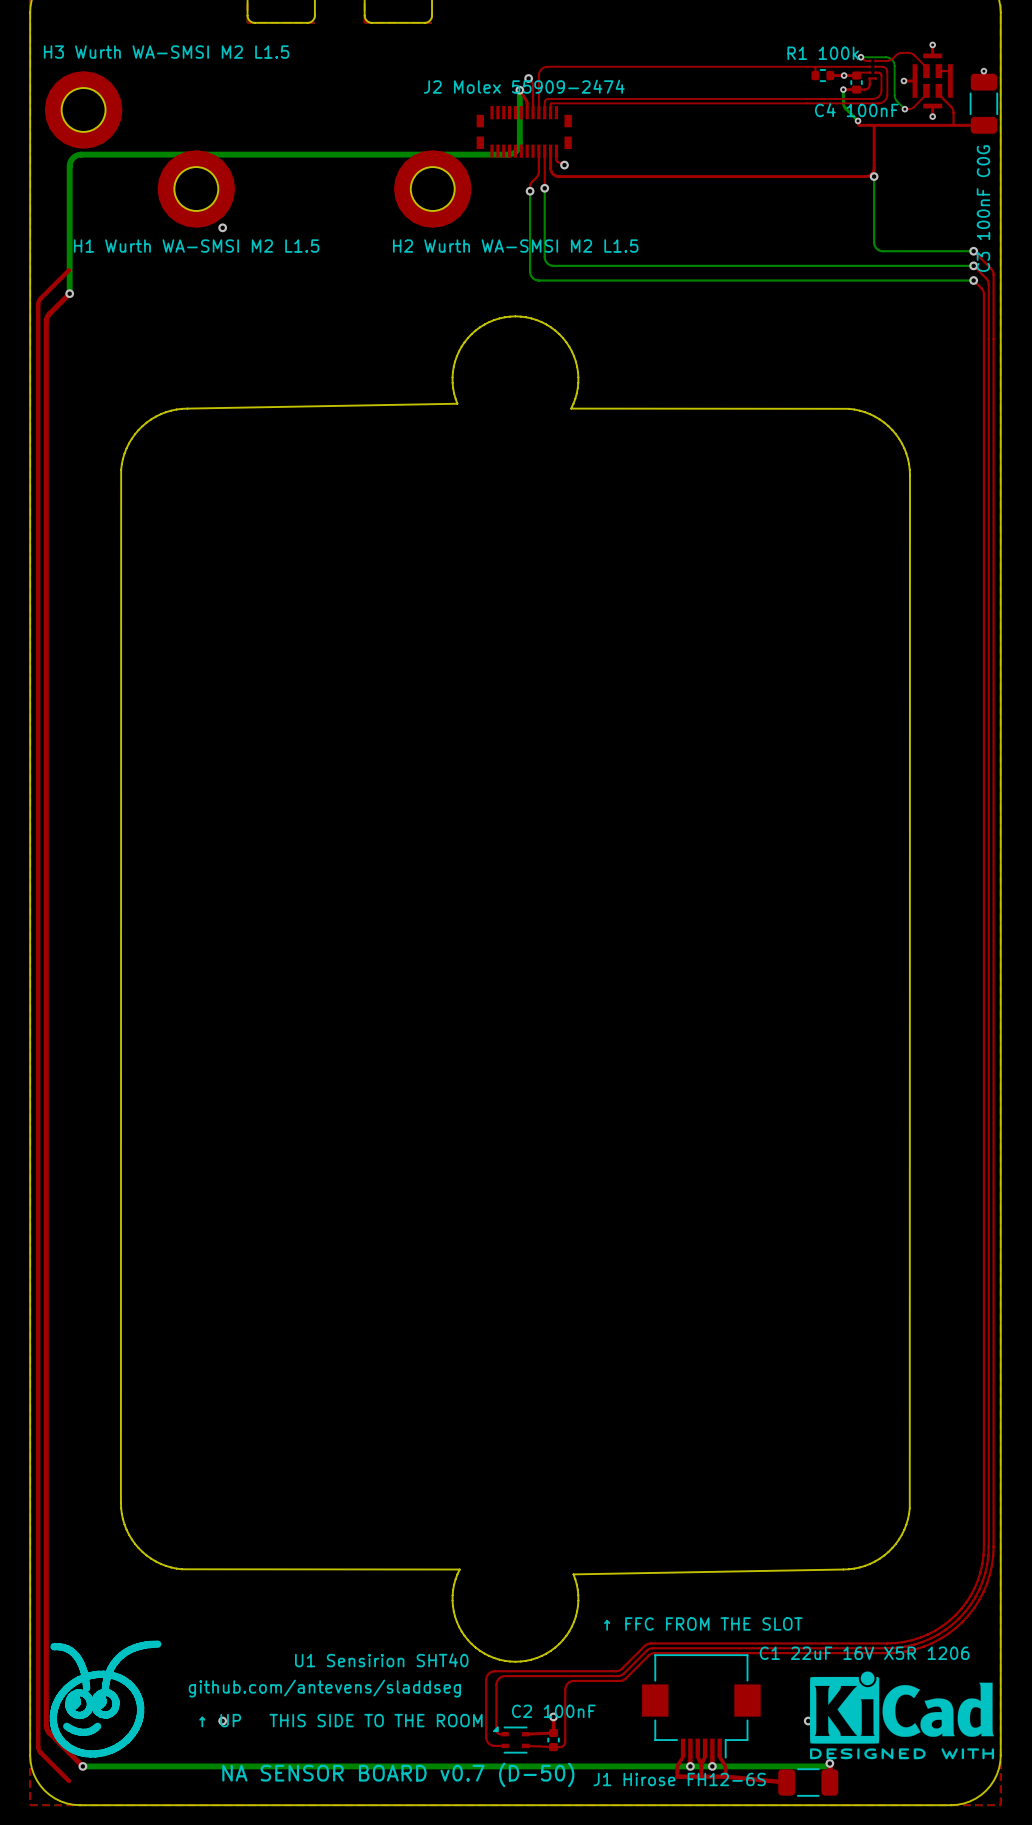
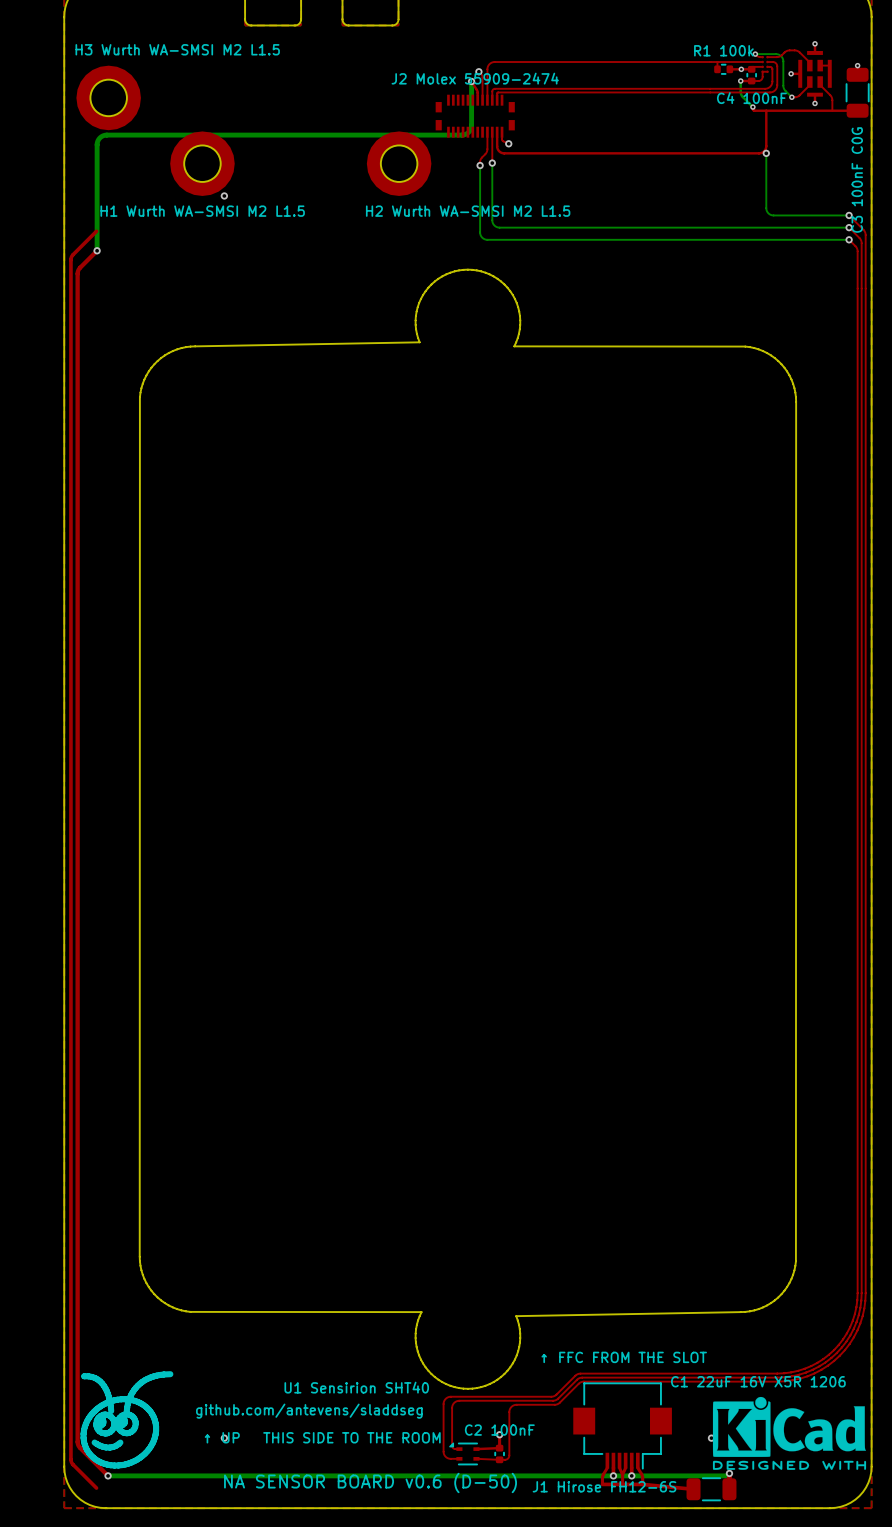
text: NA SENSOR BOARD v0.7 (D-50) (398, 1774) -> NA SENSOR BOARD v0.6 (D-50) (370, 1482)

